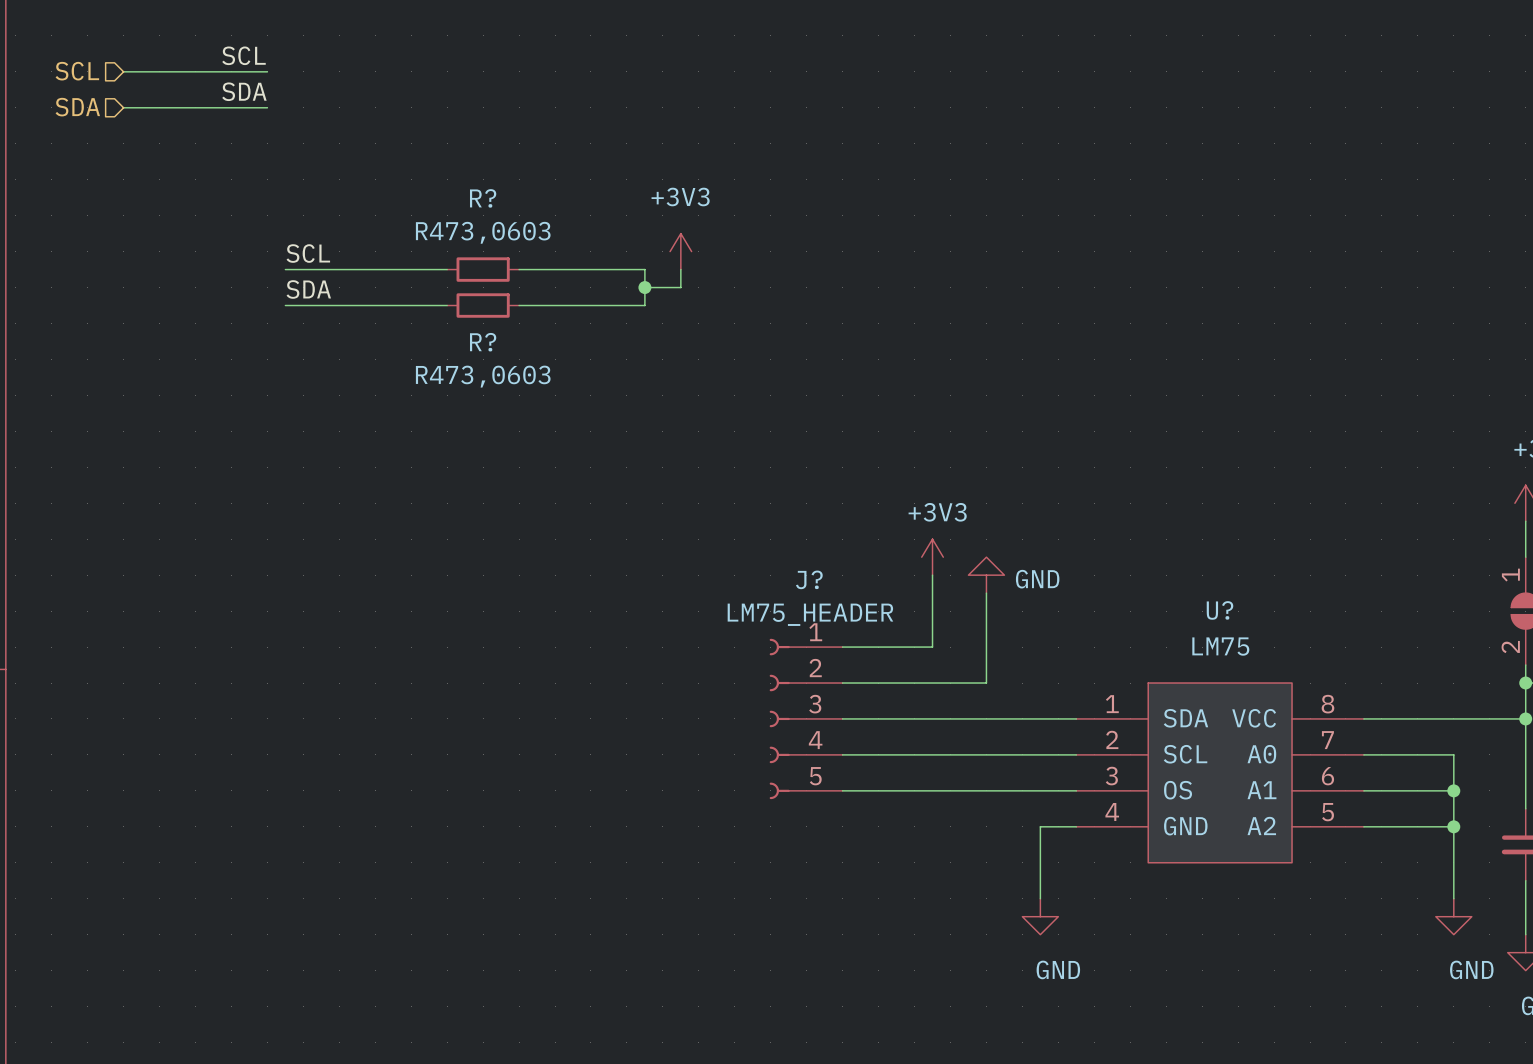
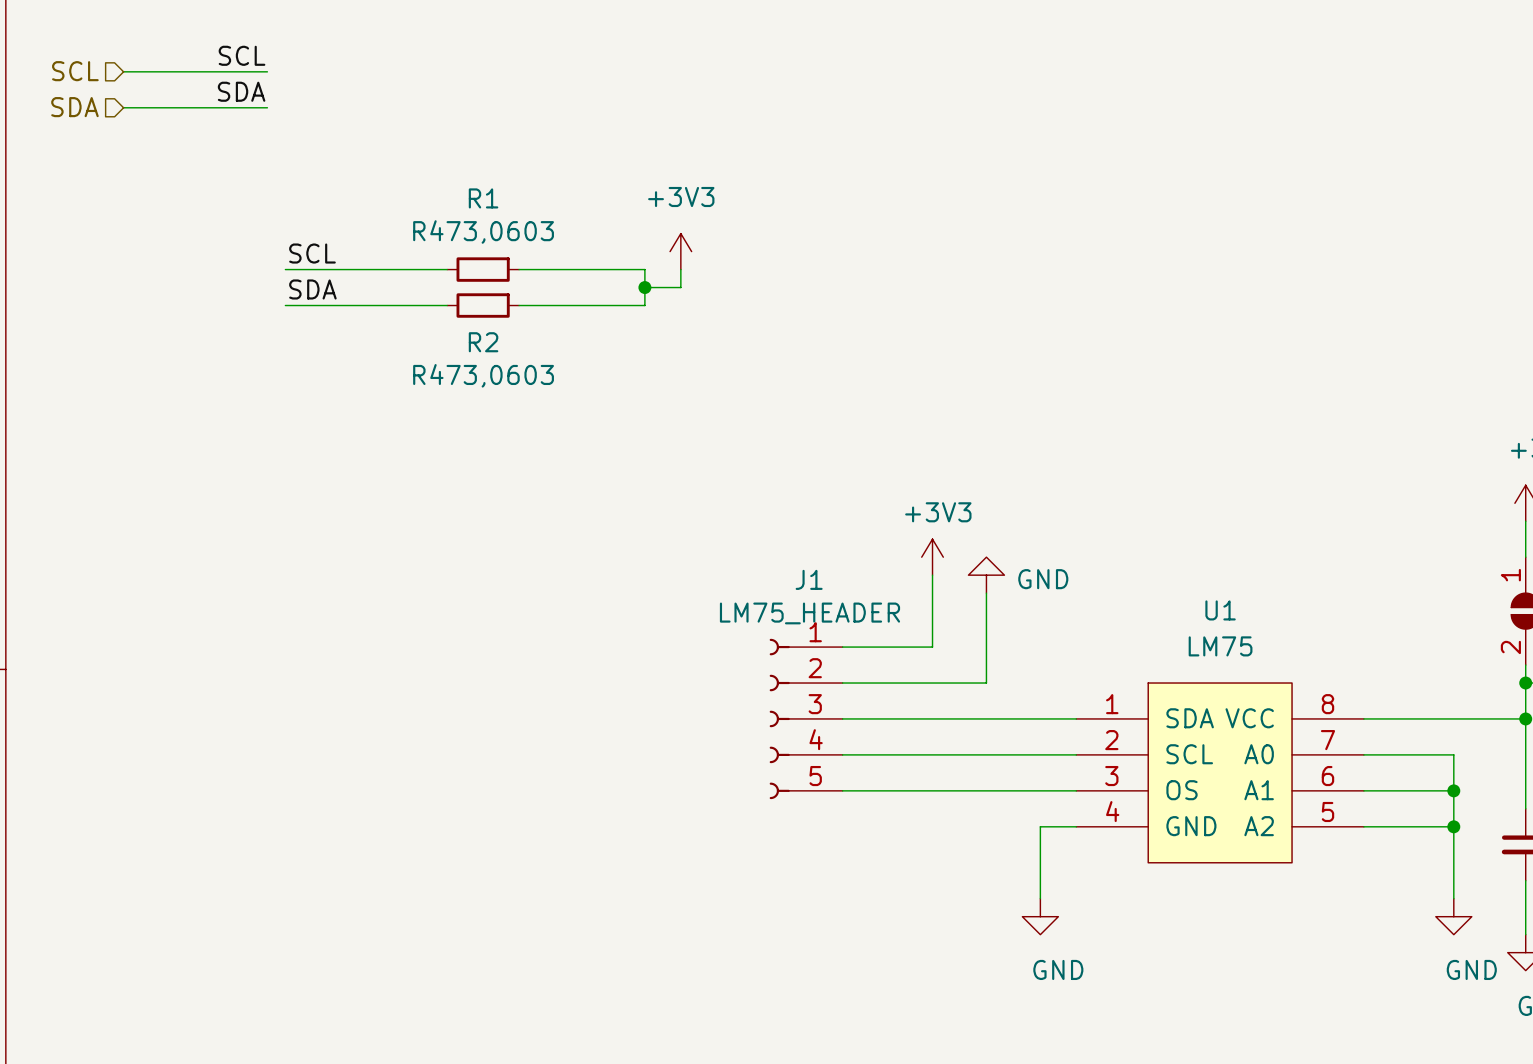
R? name: R? (483, 198) -> R1 (483, 198)
R? name: R? (483, 342) -> R2 (483, 342)
J? name: J? (809, 579) -> J1 (809, 579)
U? name: U? (1220, 610) -> U1 (1220, 610)

